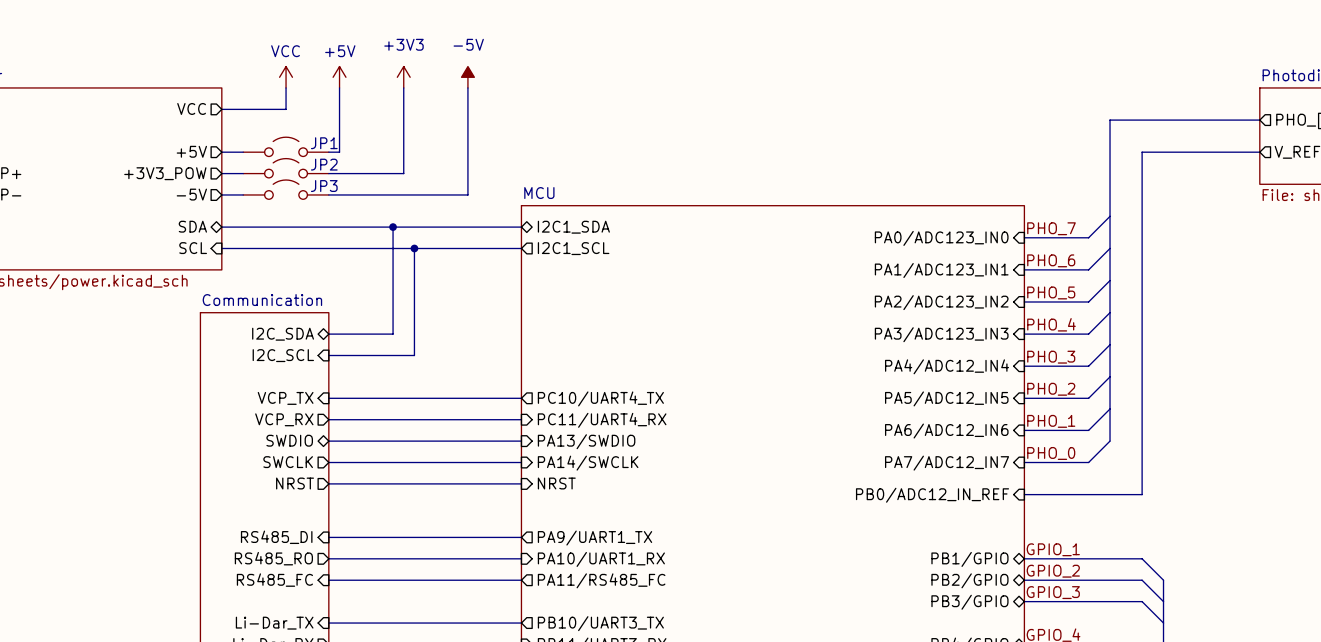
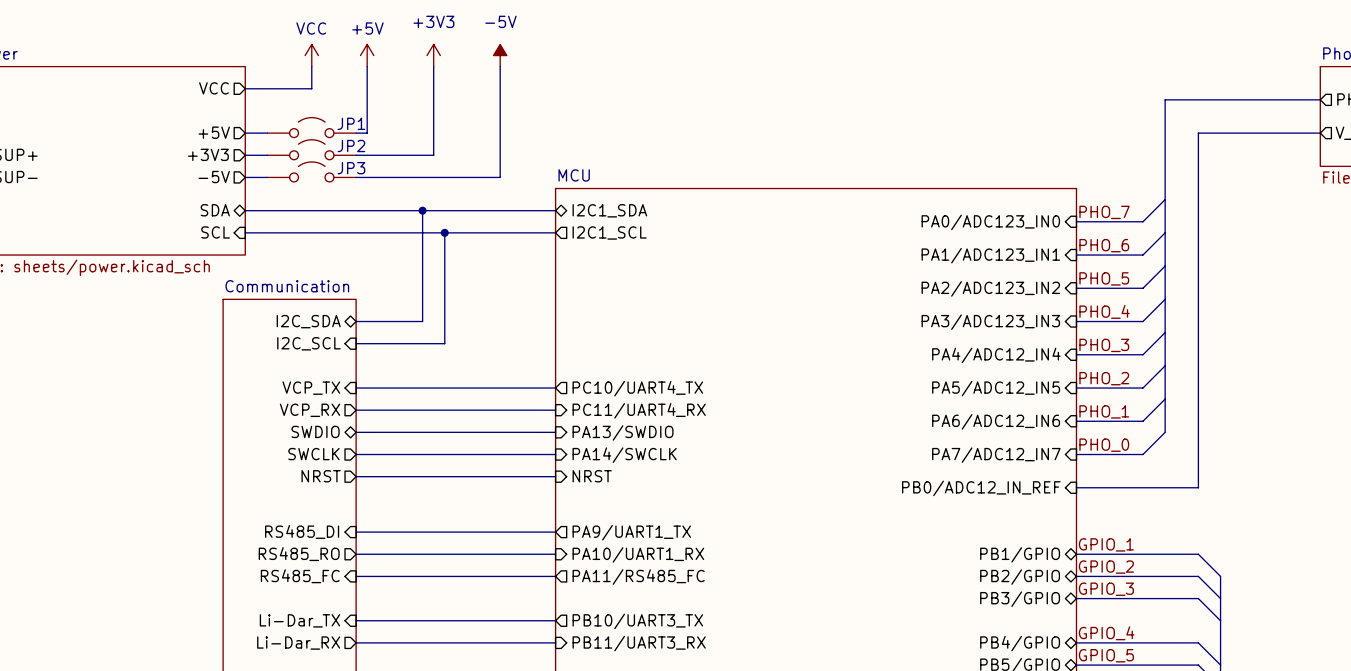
sheet pin: +3V3_POW (165, 173) -> +3V3 (208, 154)

